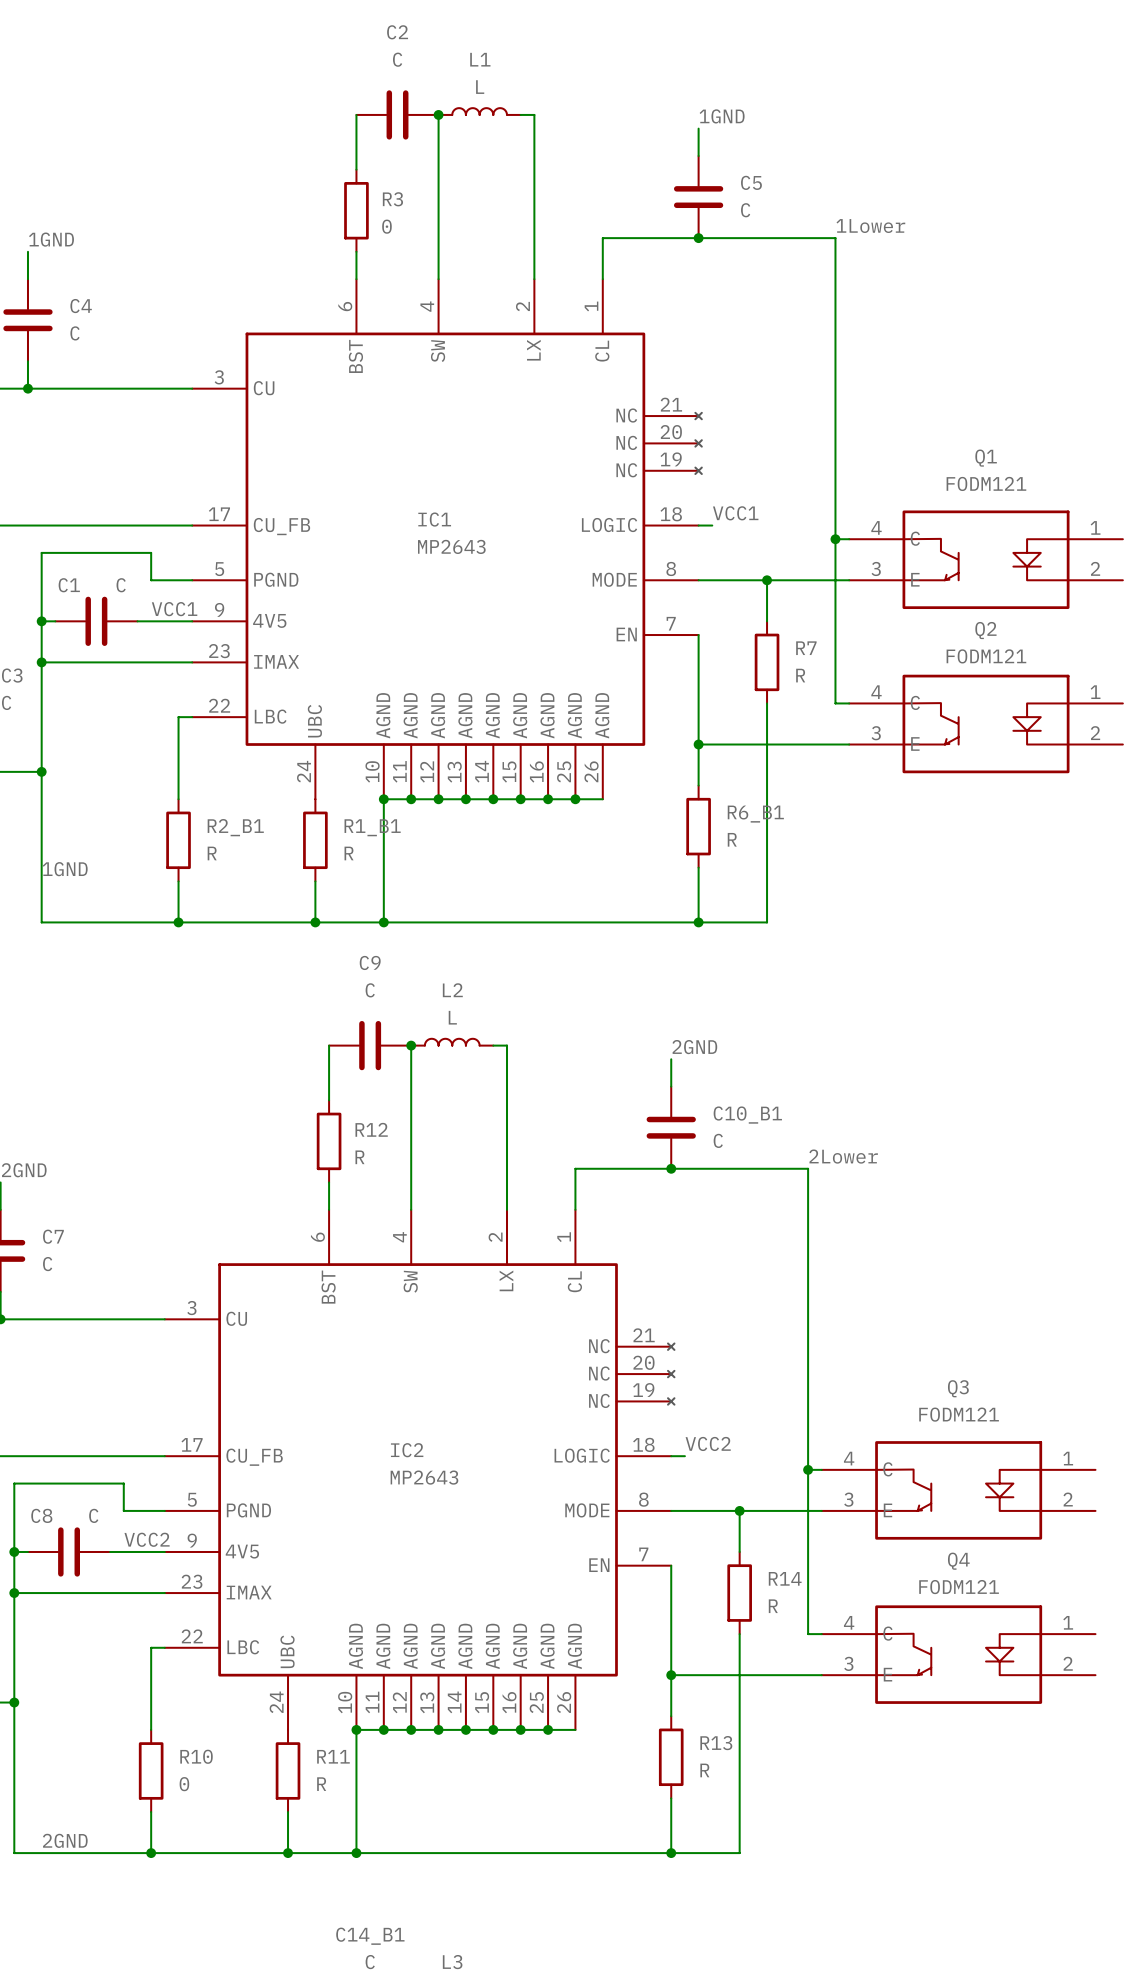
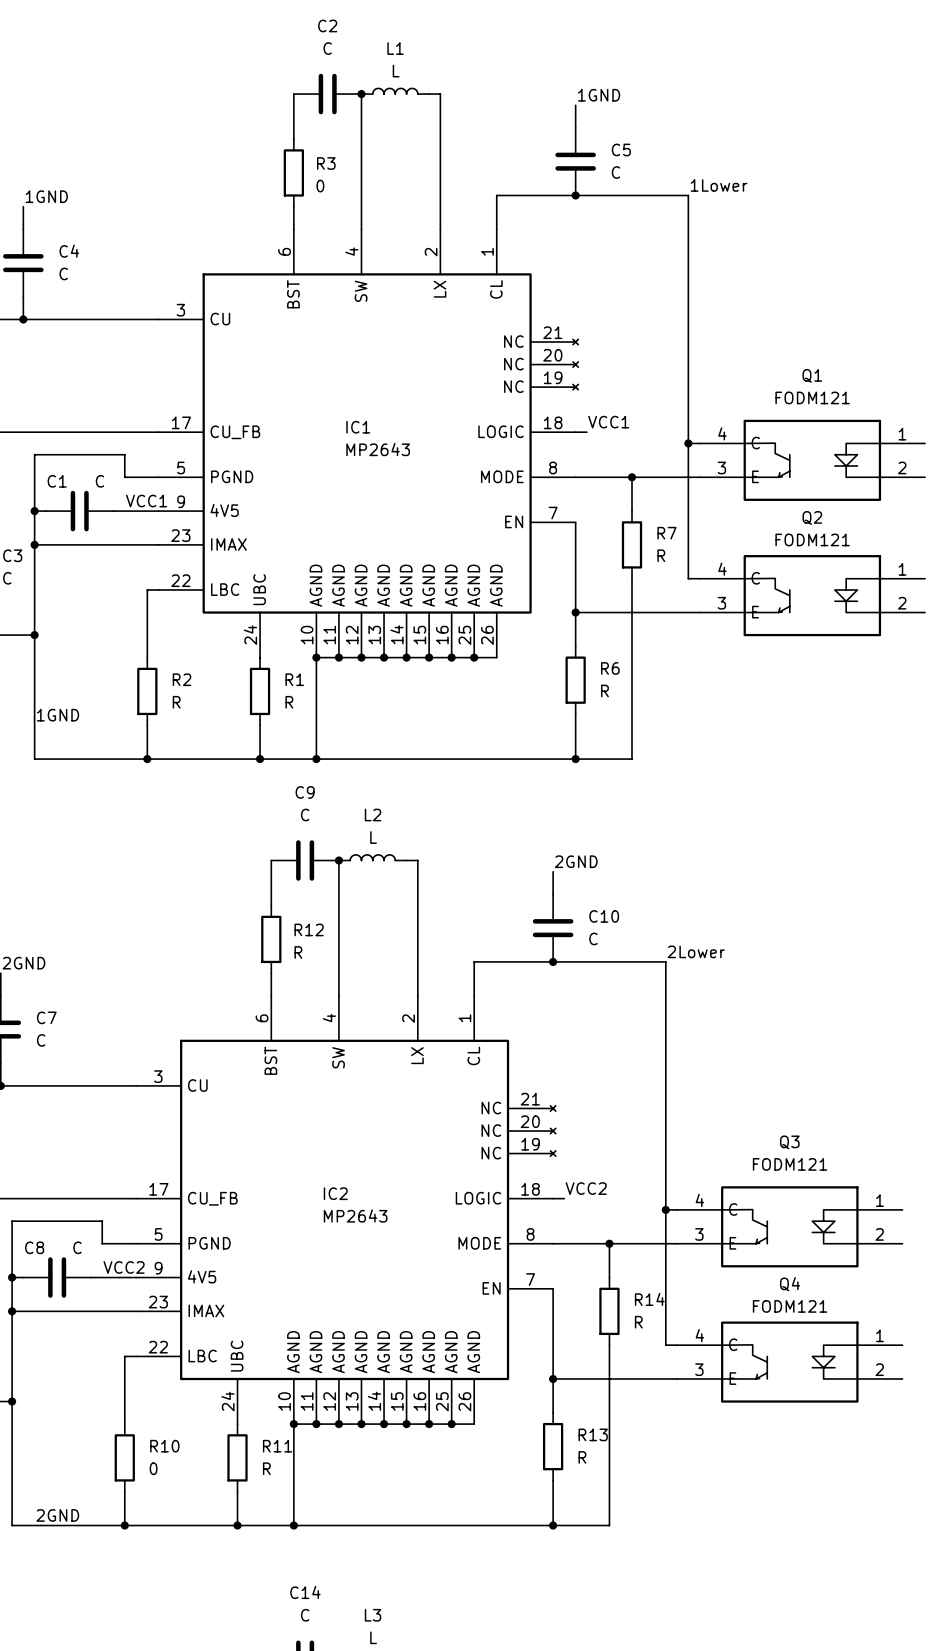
R6_B1 name: R6_B1 (755, 814) -> R6 (610, 668)
R2_B1 name: R2_B1 (235, 827) -> R2 (182, 679)
R1_B1 name: R1_B1 (372, 827) -> R1 (294, 679)
C10_B1 name: C10_B1 (747, 1115) -> C10 (604, 916)
C14_B1 name: C14_B1 (370, 1936) -> C14 (305, 1592)

